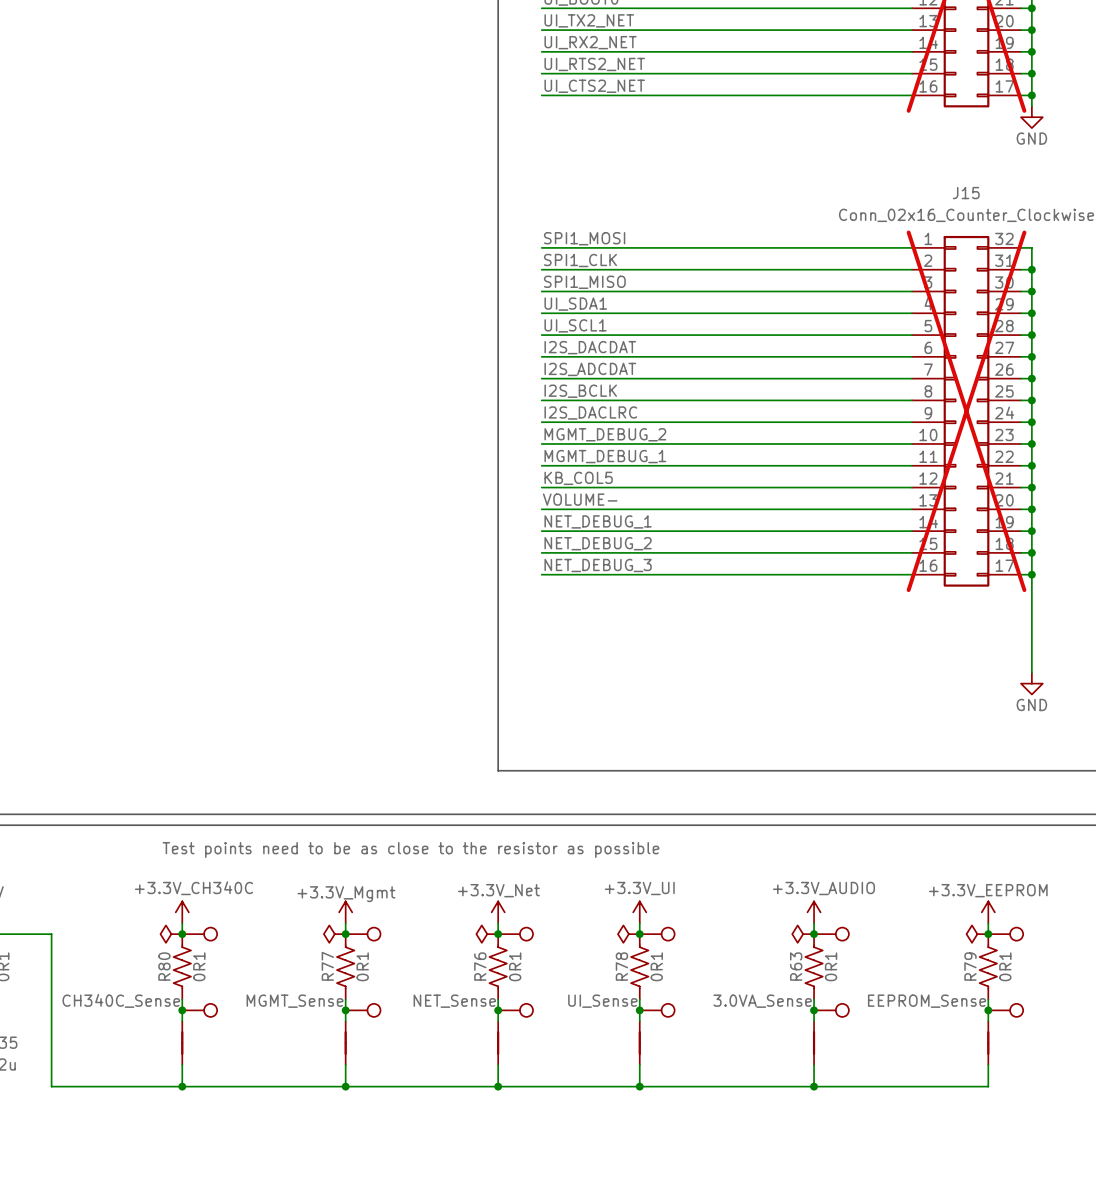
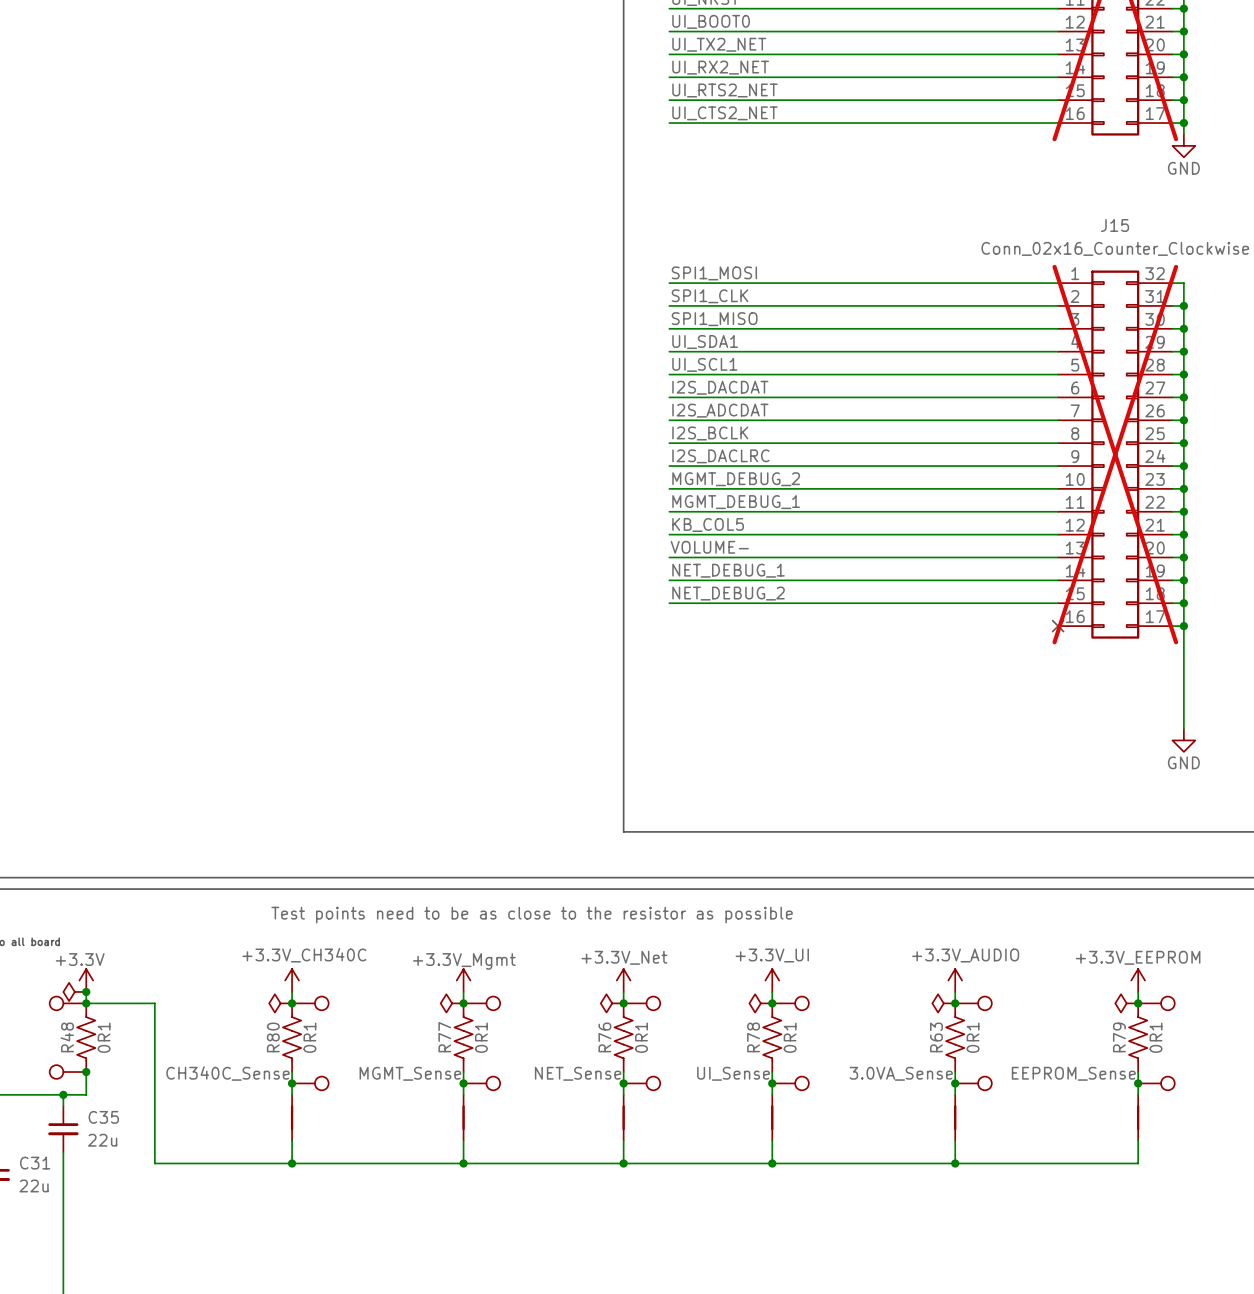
label: NET_DEBUG_3 (598, 565) -> none
wire: (541, 574) (912, 574) -> none
no-connect mark: none -> (1058, 626)

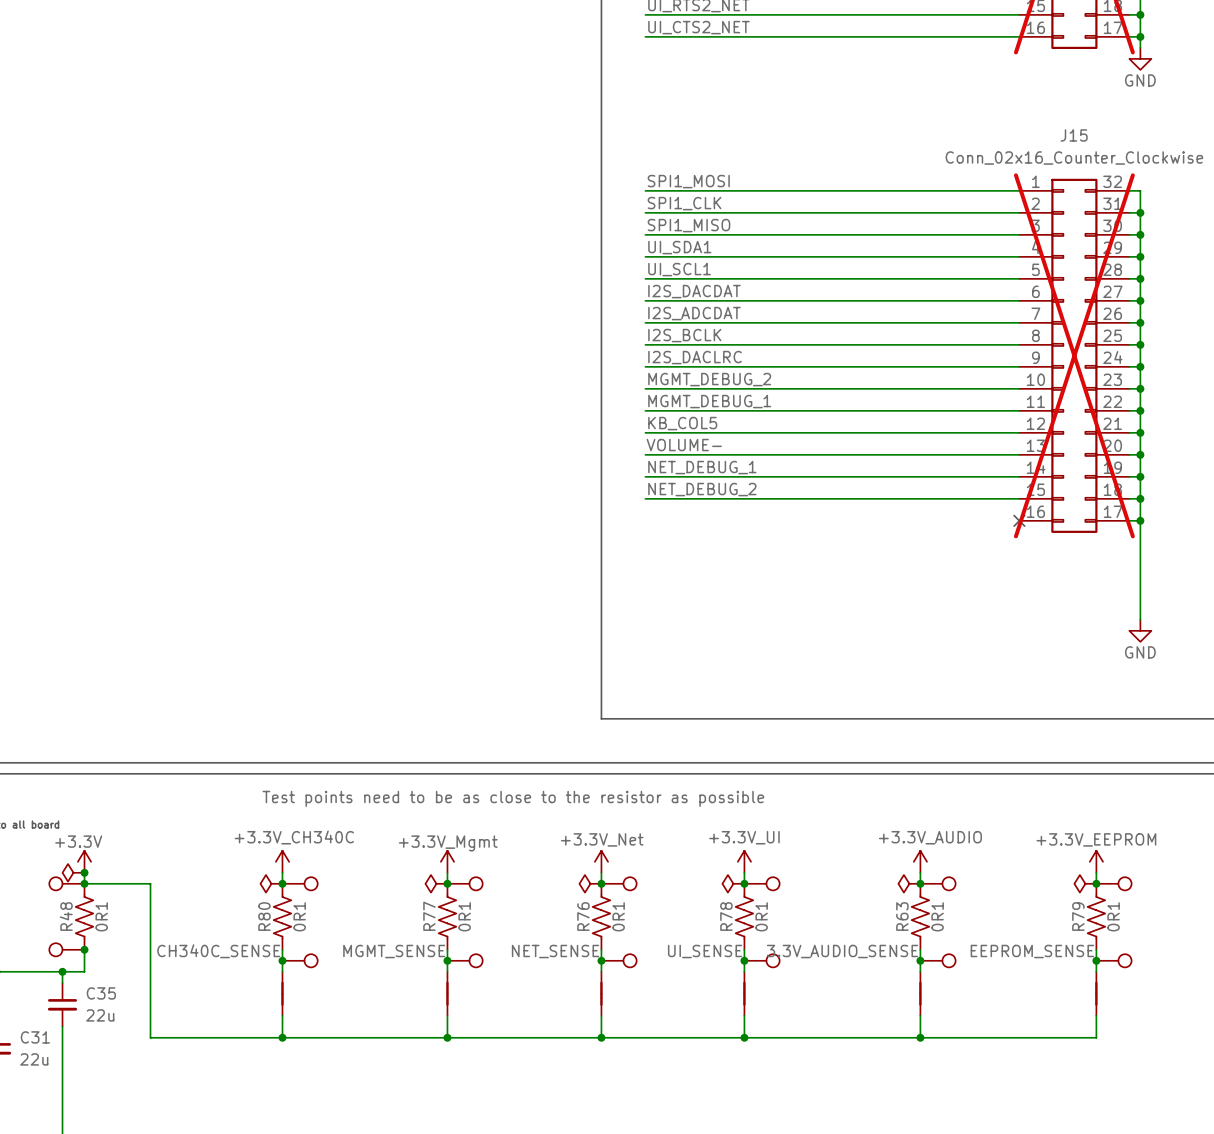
label: CH340C_Sense (228, 1073) -> CH340C_SENSE (218, 951)
label: MGMT_Sense (410, 1073) -> MGMT_SENSE (394, 951)
label: NET_Sense (578, 1073) -> NET_SENSE (555, 951)
label: UI_Sense (733, 1073) -> UI_SENSE (705, 951)
label: 3.0VA_Sense (901, 1073) -> 3.3V_AUDIO_SENSE (842, 951)
label: EEPROM_Sense (1073, 1073) -> EEPROM_SENSE (1032, 951)

